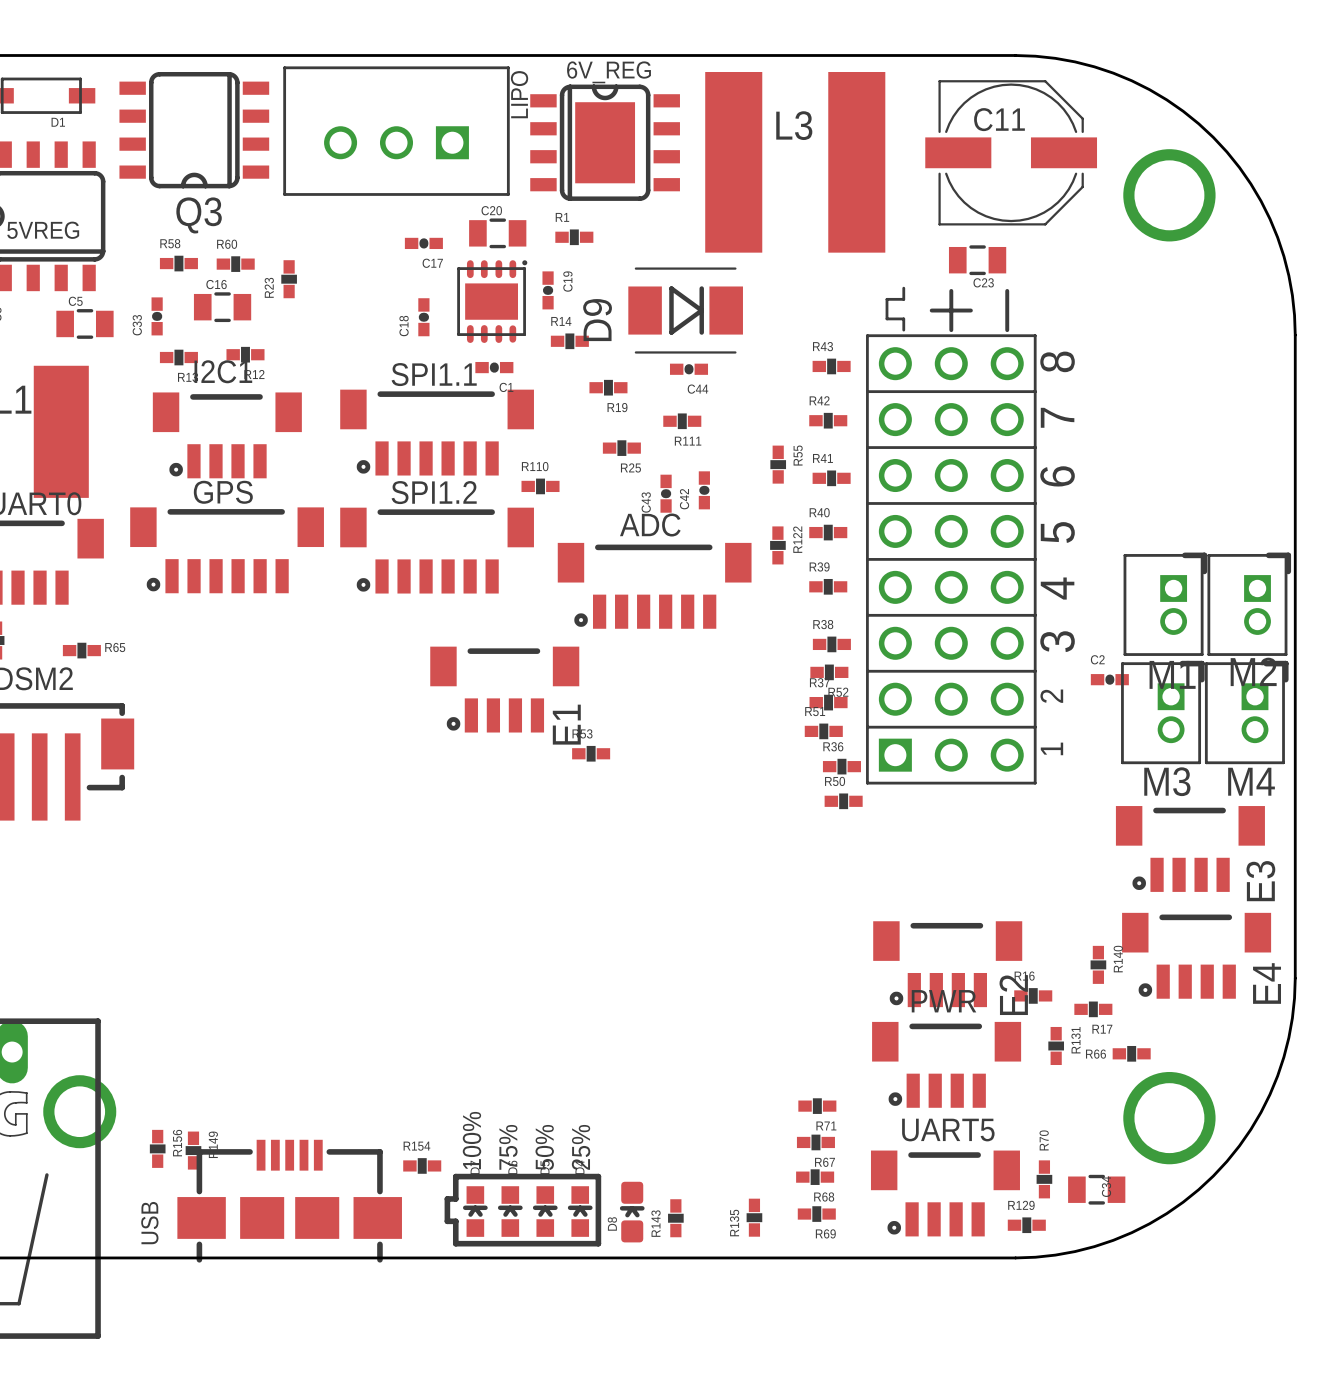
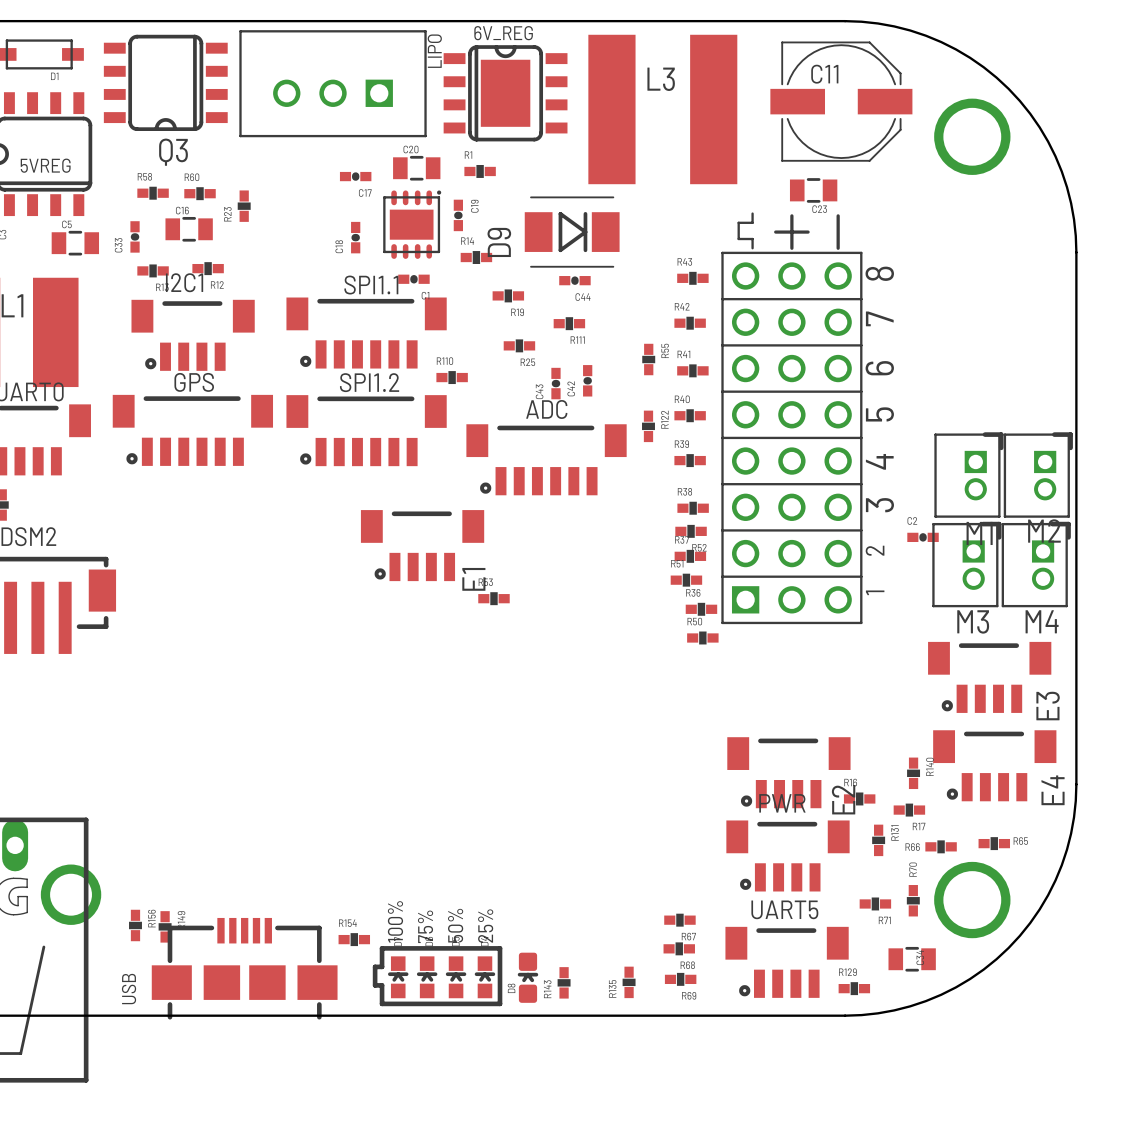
R65 position: (81, 650) -> (994, 843)
R71 position: (817, 1106) -> (875, 903)
R70 position: (1044, 1179) -> (913, 900)

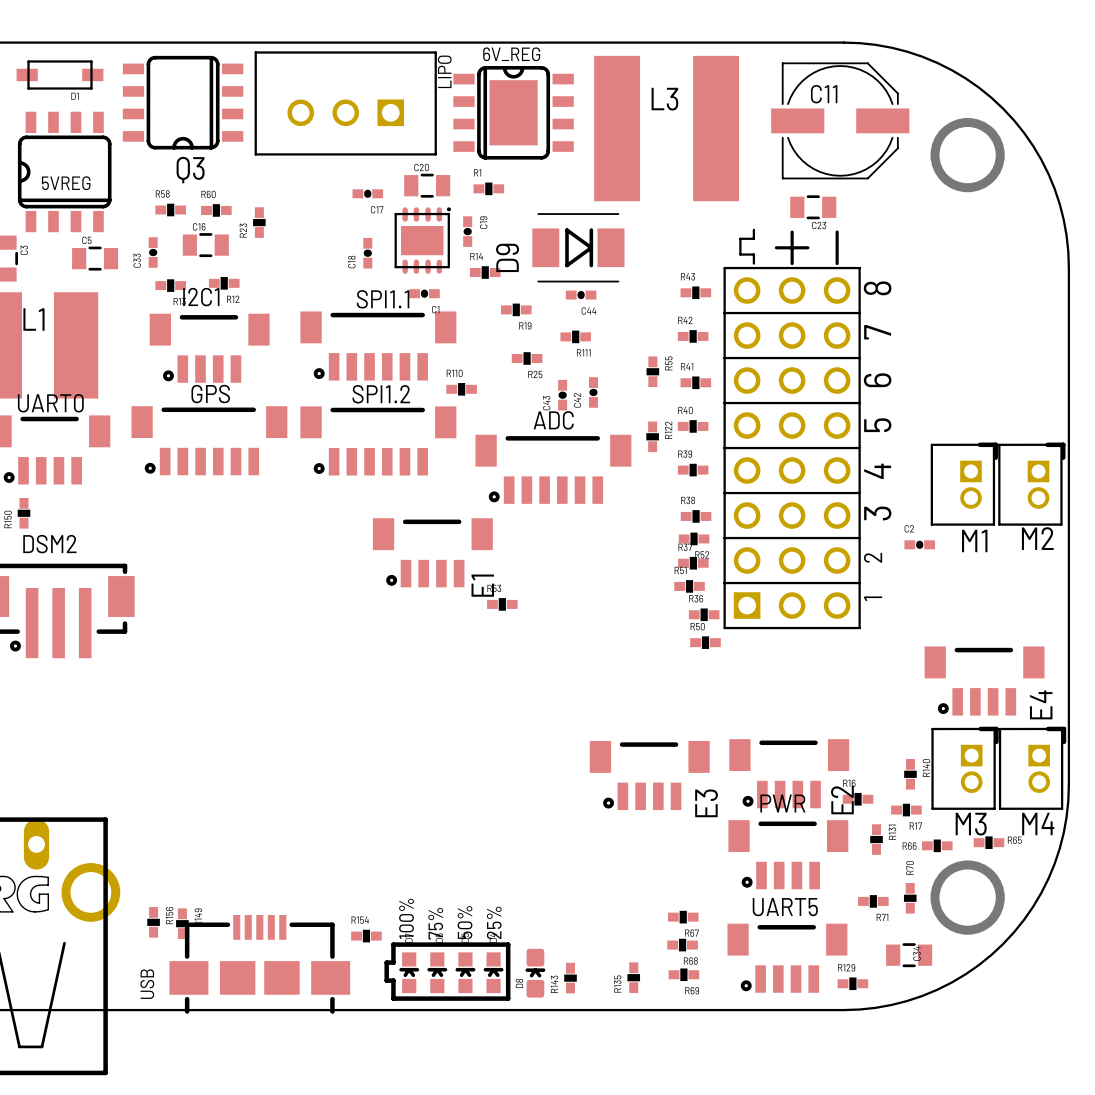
M3 position: (966, 564) -> (965, 768)
M4 position: (1036, 564) -> (1032, 768)
E3 name: E3 (1048, 706) -> E4 (1041, 704)
E4: (994, 765) -> none
E3: none -> (649, 775)

